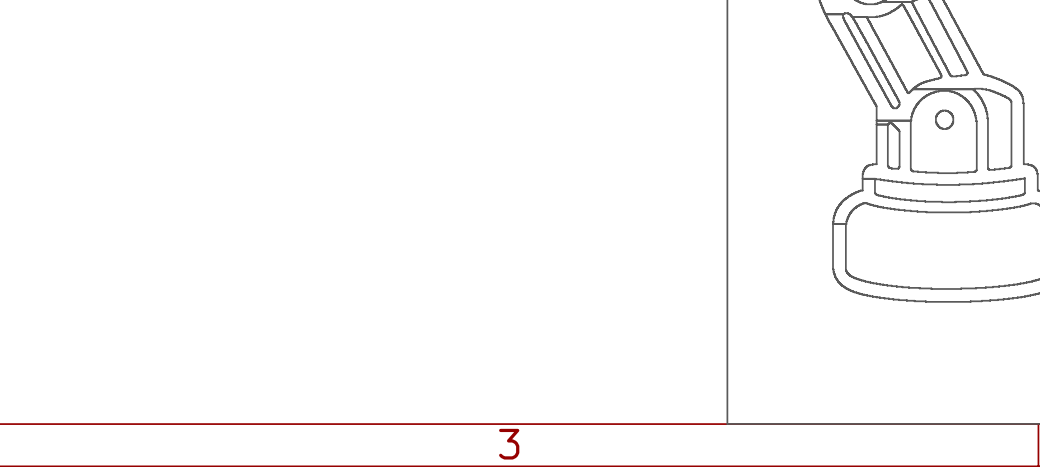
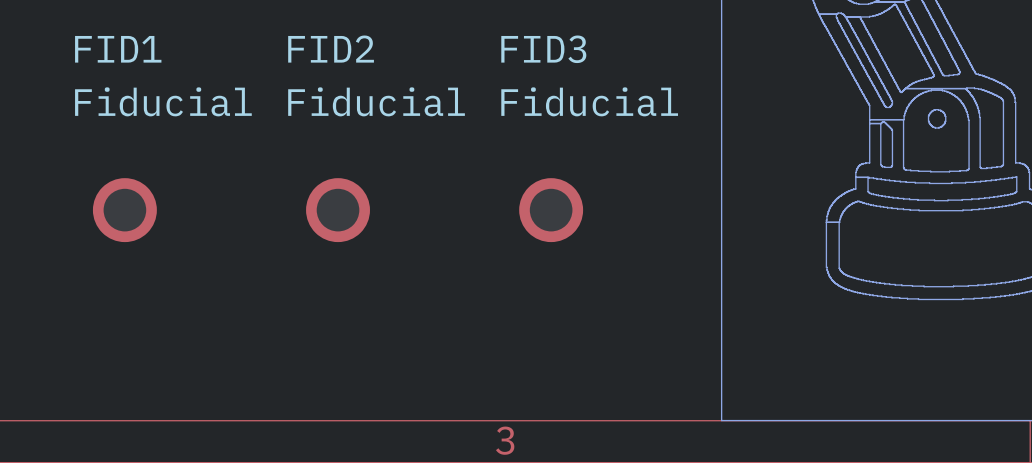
FID1: none -> Fiducial (124, 210)
FID2: none -> Fiducial (338, 210)
FID3: none -> Fiducial (551, 210)

